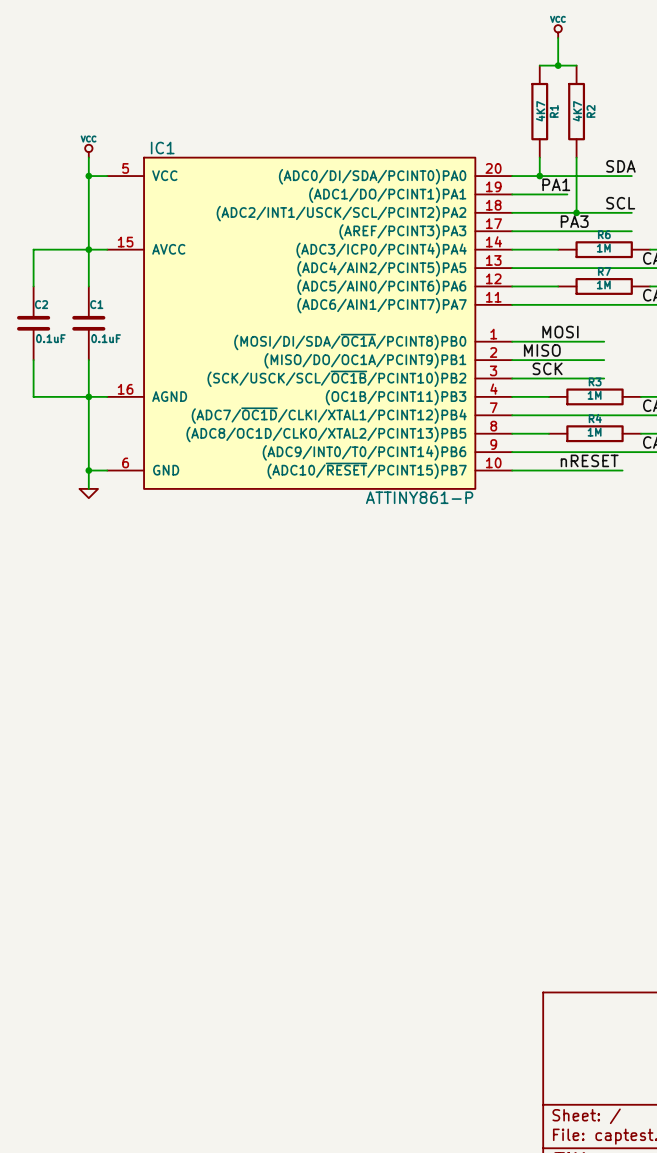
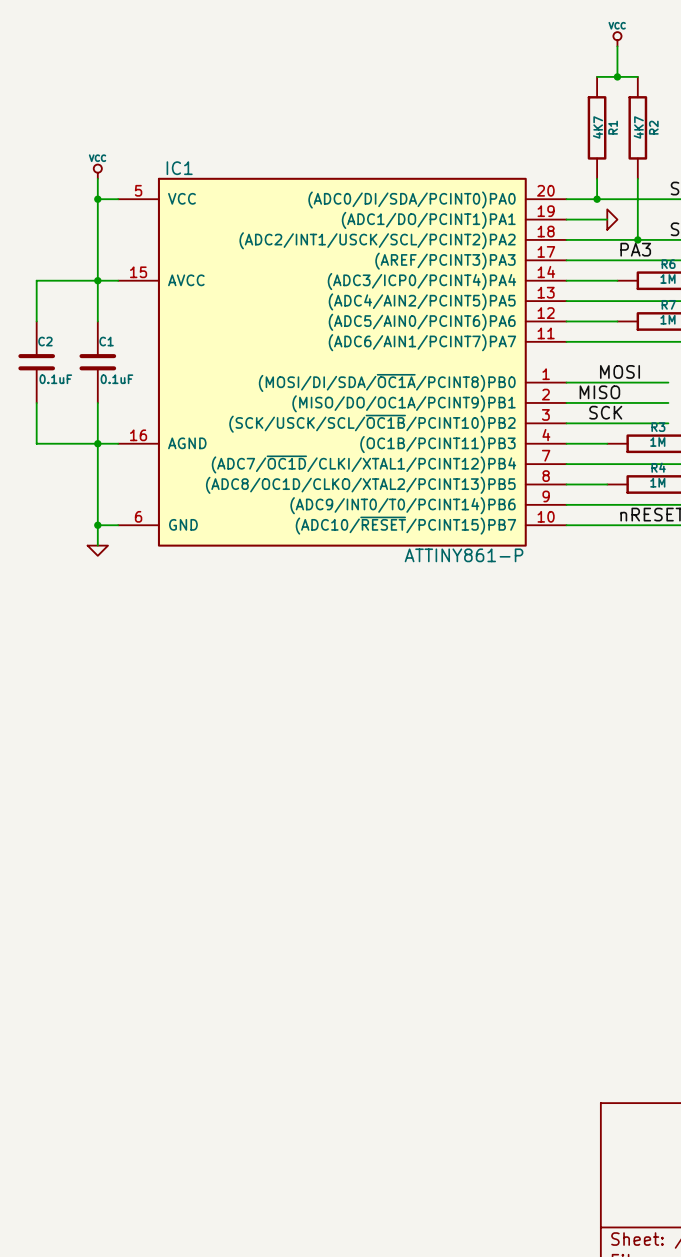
label: PA1 (556, 184) -> none
wire: (548, 194) (567, 194) -> none
power symbol: none -> (612, 219)

